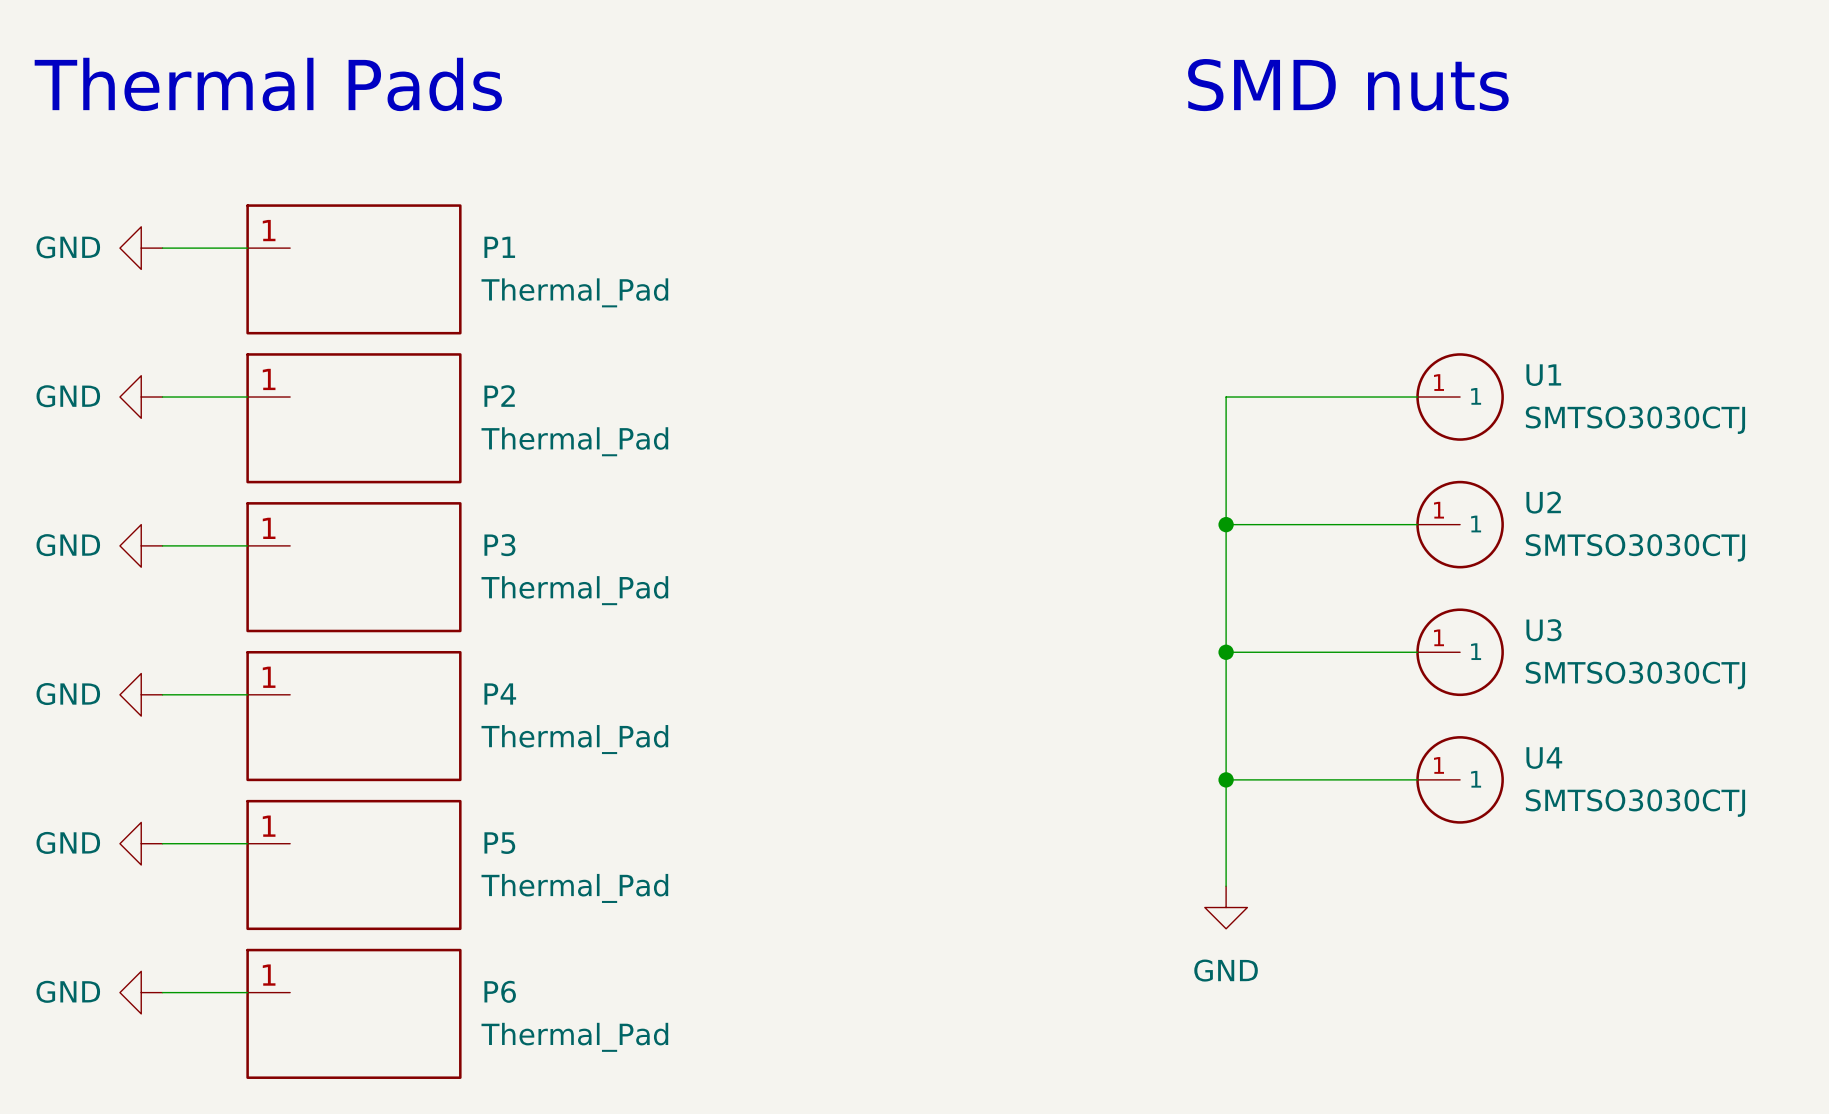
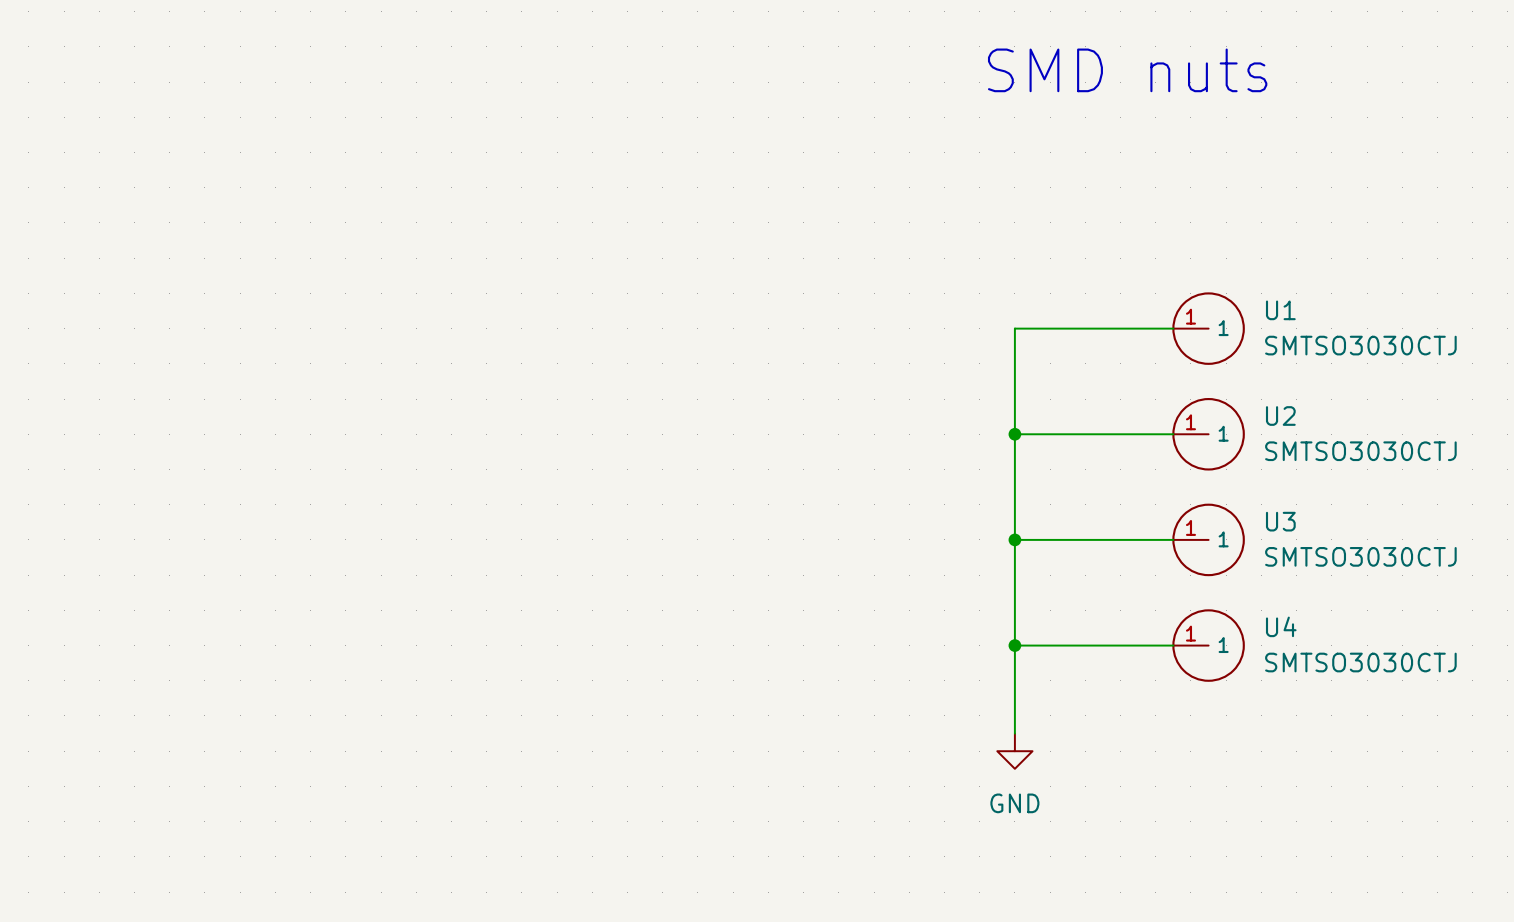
text: Thermal Pads (268, 84) -> none
power symbol: GND (141, 248) -> none
wire: (162, 248) (247, 248) -> none
P1: Thermal_Pad (353, 269) -> none
power symbol: GND (141, 397) -> none
wire: (162, 397) (247, 397) -> none
P2: Thermal_Pad (353, 418) -> none
power symbol: GND (141, 545) -> none
wire: (162, 545) (247, 545) -> none
P3: Thermal_Pad (353, 567) -> none
power symbol: GND (141, 694) -> none
wire: (162, 694) (247, 694) -> none
P4: Thermal_Pad (353, 716) -> none
power symbol: GND (141, 843) -> none
wire: (162, 843) (247, 843) -> none
P5: Thermal_Pad (353, 864) -> none
power symbol: GND (141, 992) -> none
wire: (162, 992) (247, 992) -> none
P6: Thermal_Pad (353, 1013) -> none

